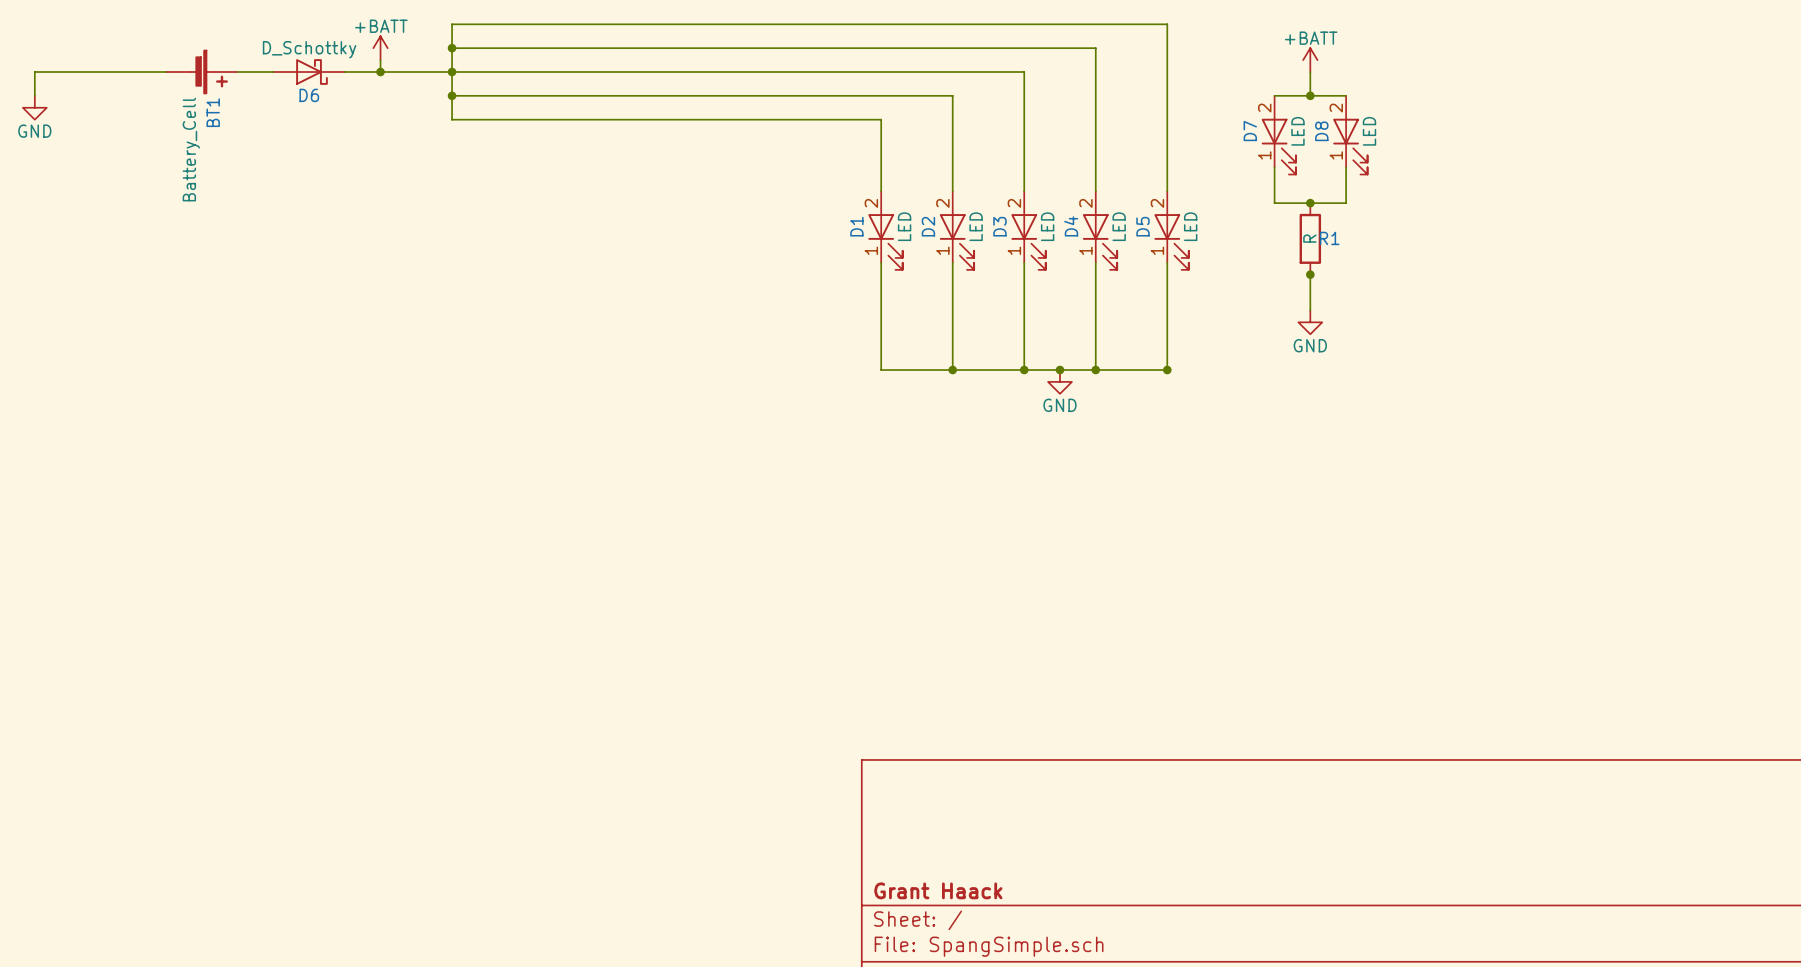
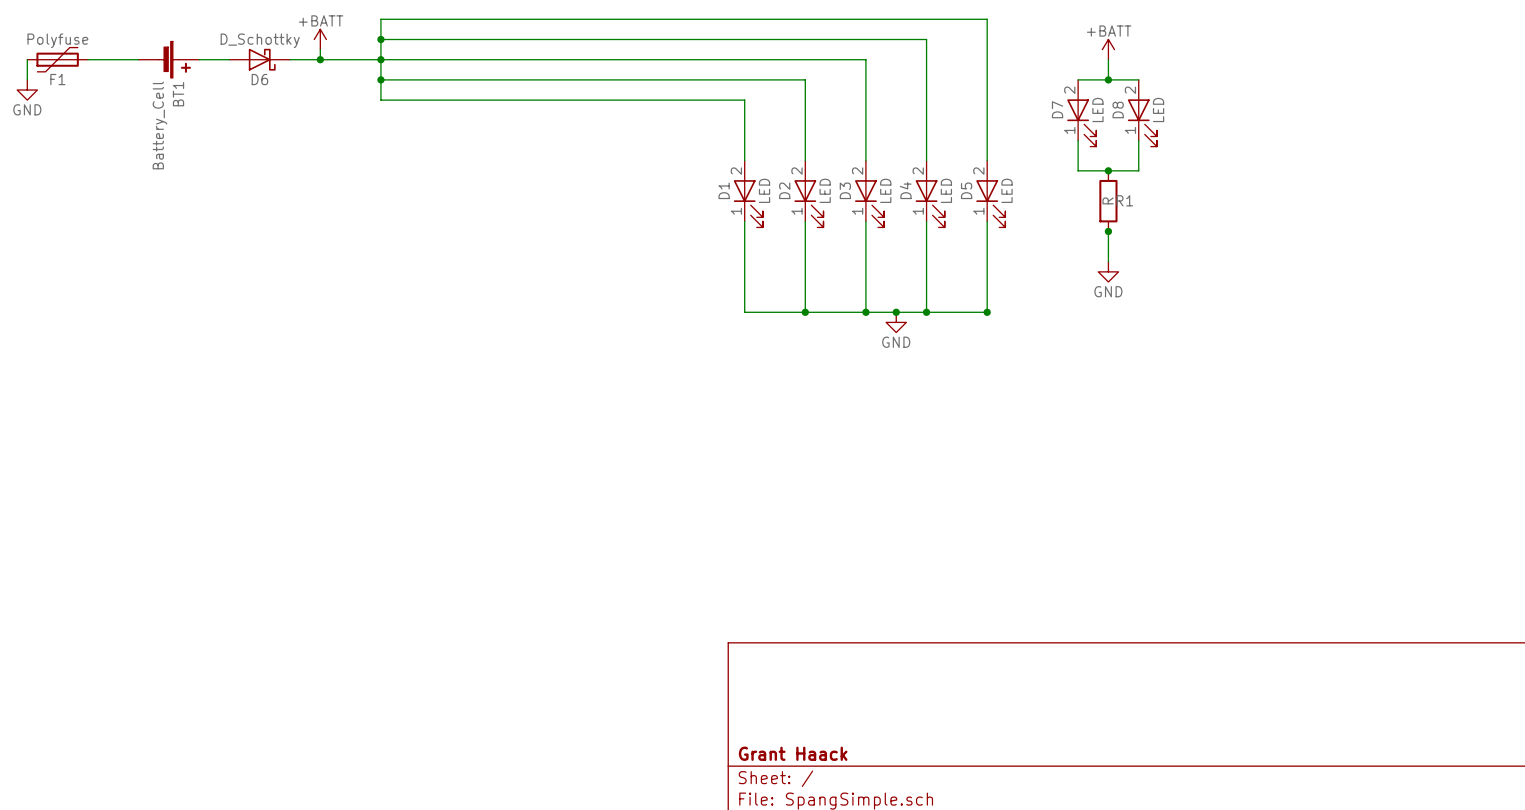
F1: none -> Polyfuse (57, 59)

